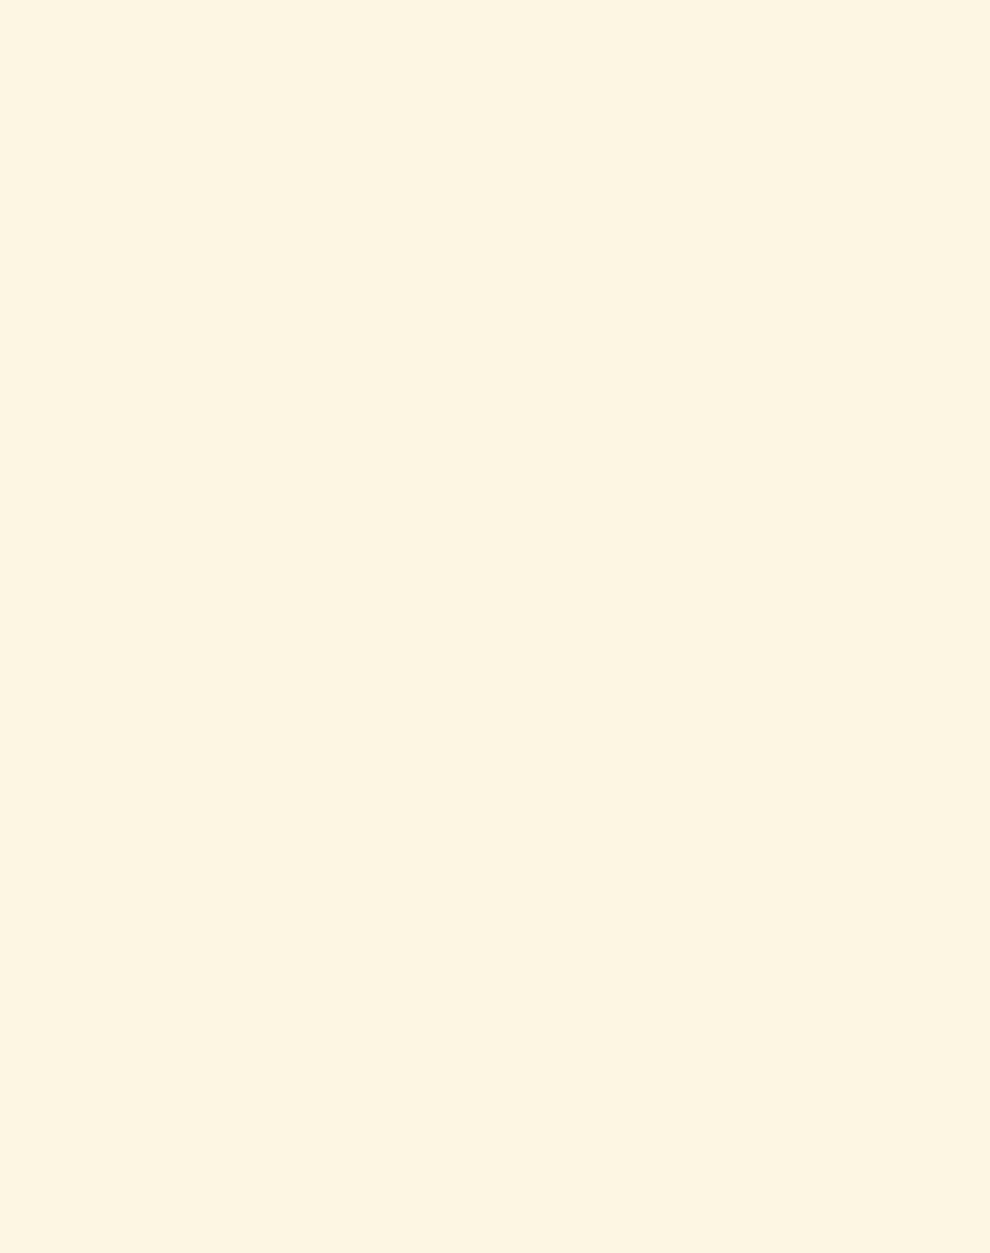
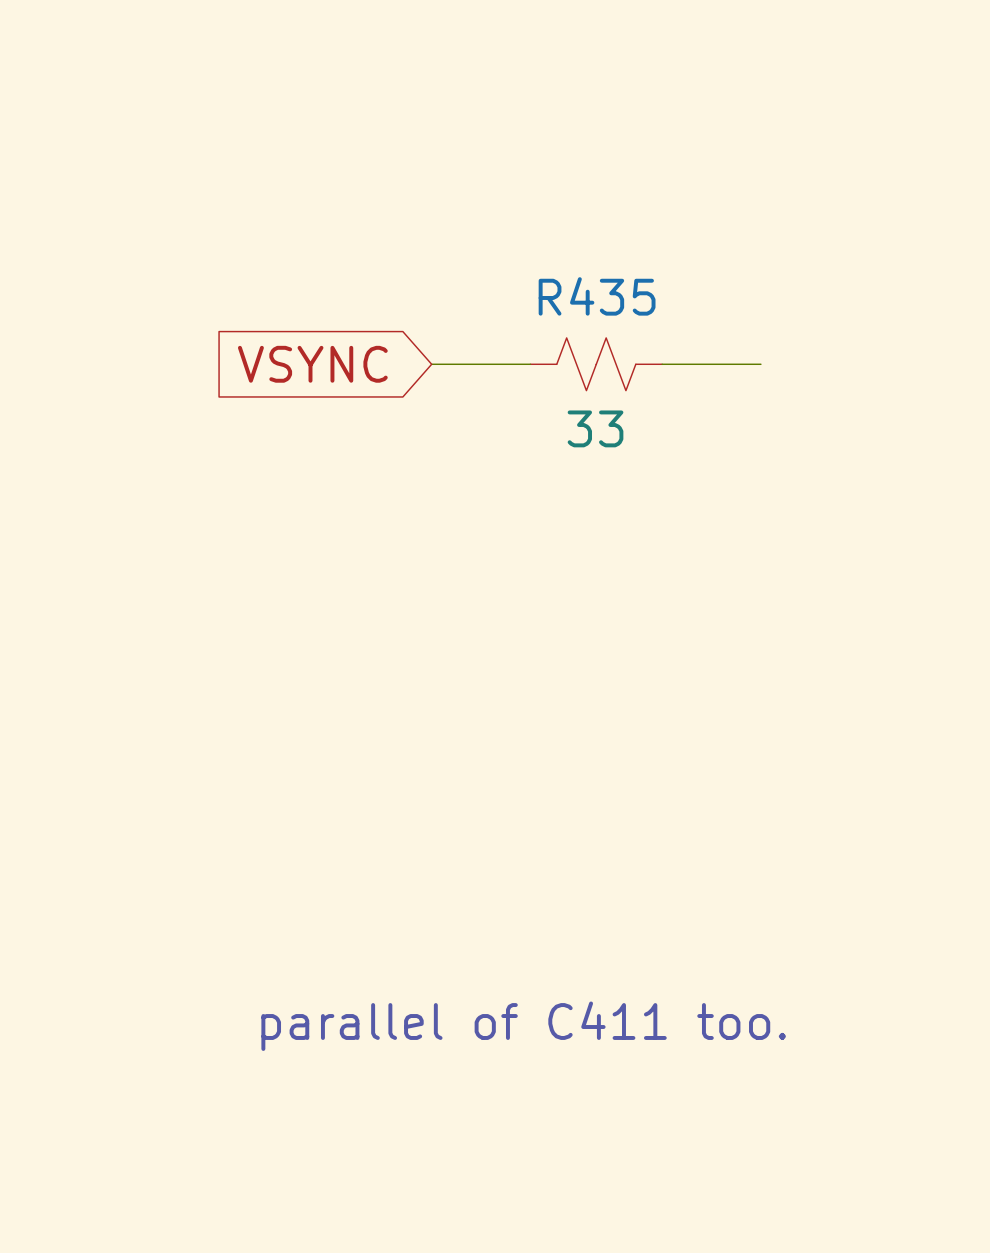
global label: none -> VSYNC (312, 364)
wire: none -> (431, 364) (530, 364)
R435: none -> 33 (596, 364)
wire: none -> (662, 364) (760, 364)
text: none -> parallel of C411 too. (523, 1026)

